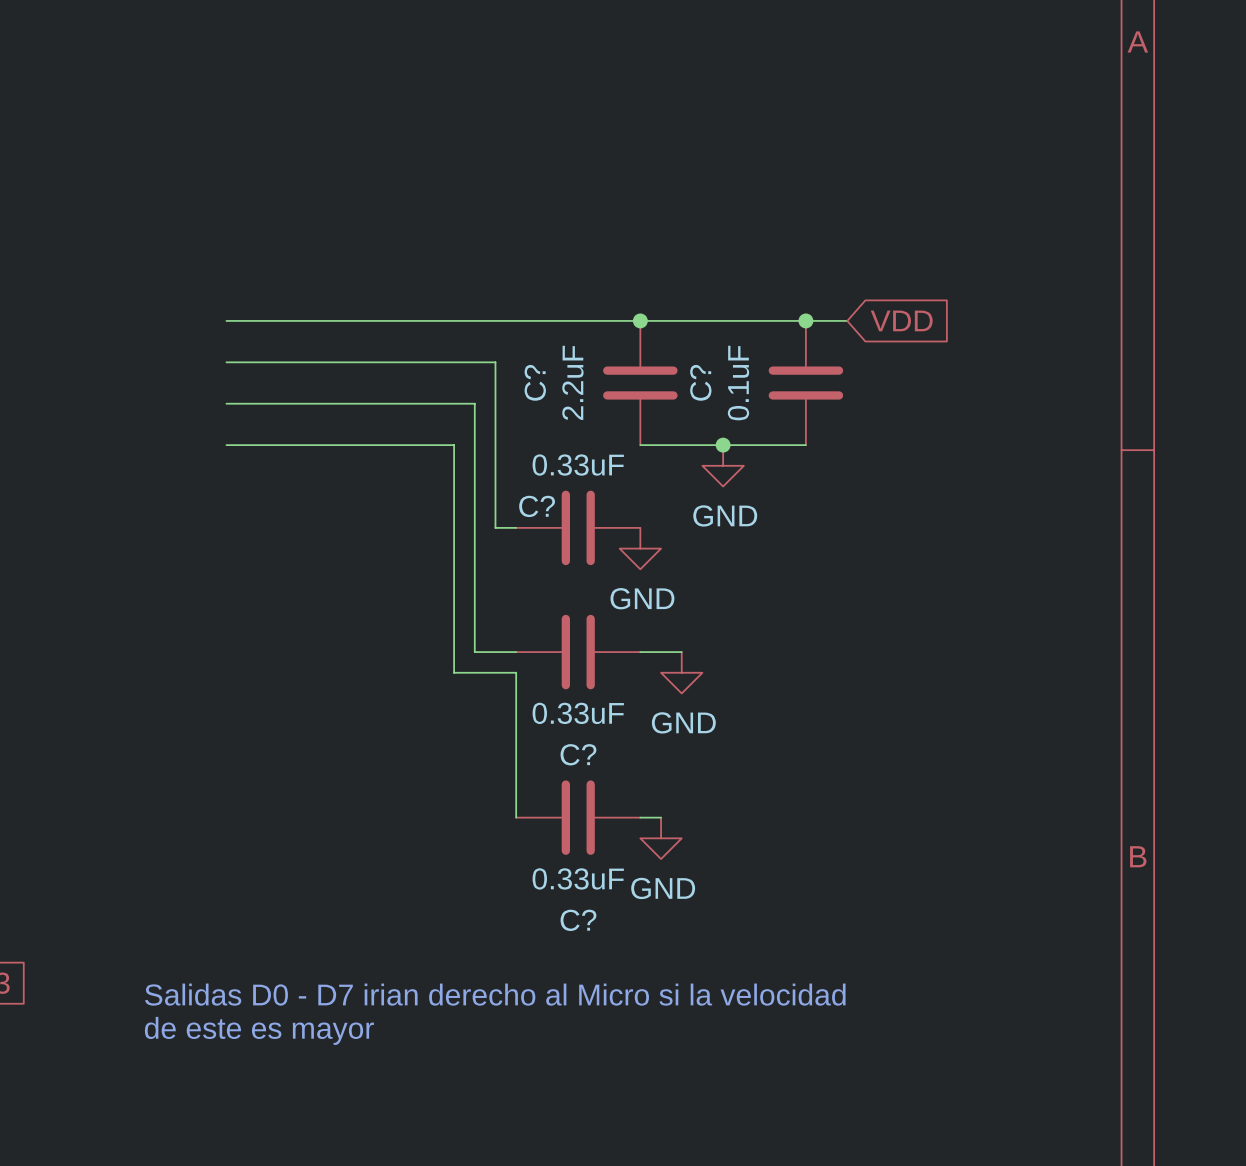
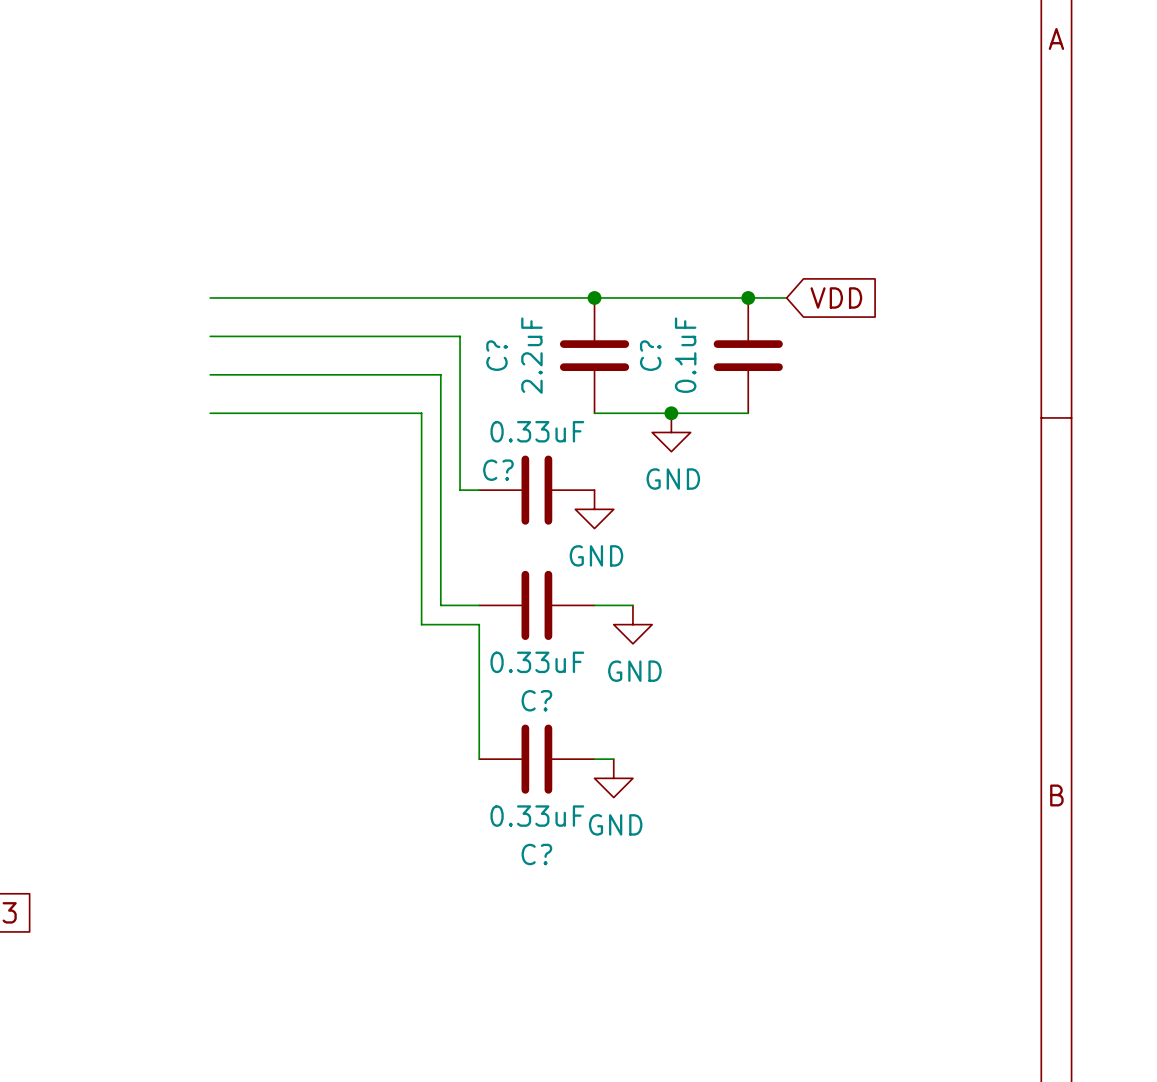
text: Salidas D0 - D7 irian derecho al Micro si la velocidad (495, 994) -> none
text: de este es mayor (259, 1030) -> none

